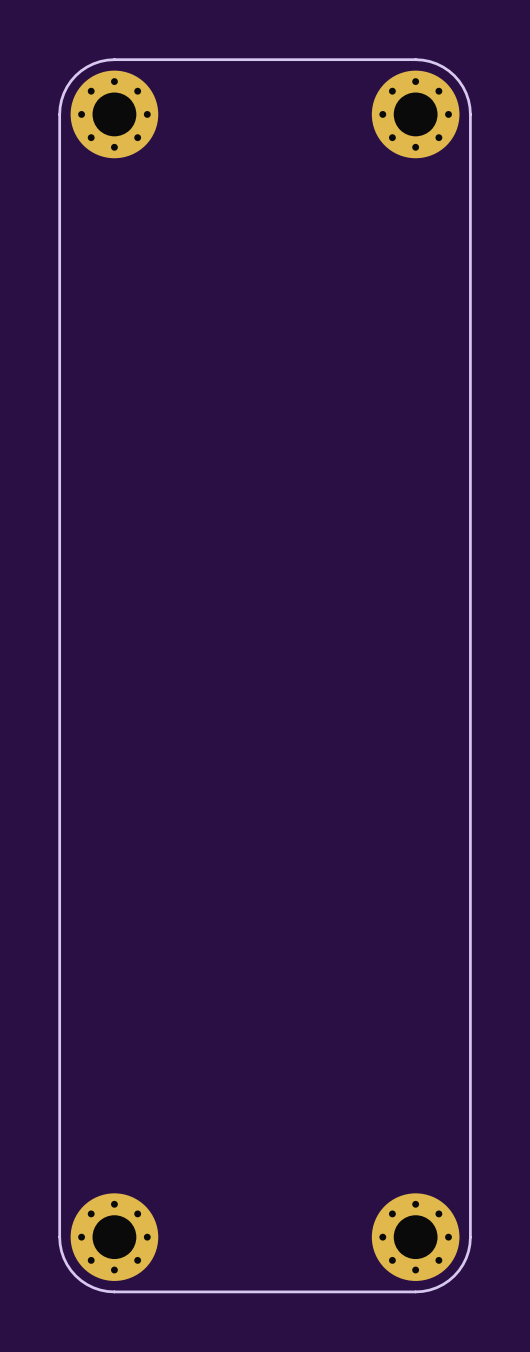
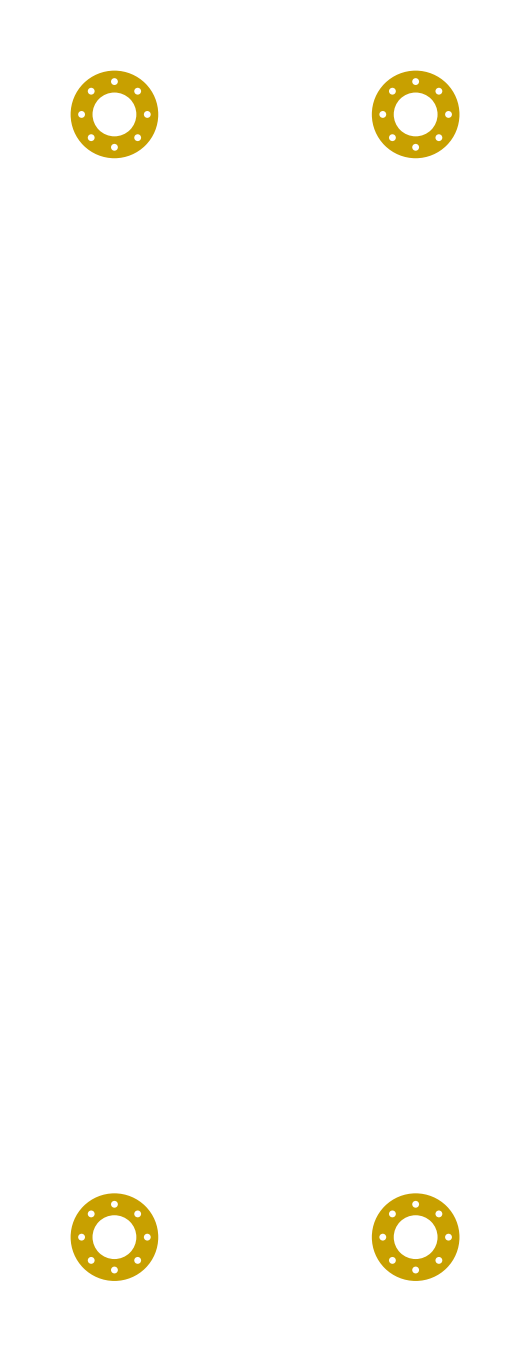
board edge: (415, 59) (107, 60) (93, 63) (75, 75) (67, 87) (61, 100) (59, 114) (59, 1237) (61, 1251) (70, 1270) (87, 1284) (100, 1290) (114, 1291) (422, 1291) (436, 1287) (454, 1275) (463, 1264) (468, 1251) (470, 1237) (470, 114) (466, 93) (454, 75) (436, 63) (415, 59) -> none

